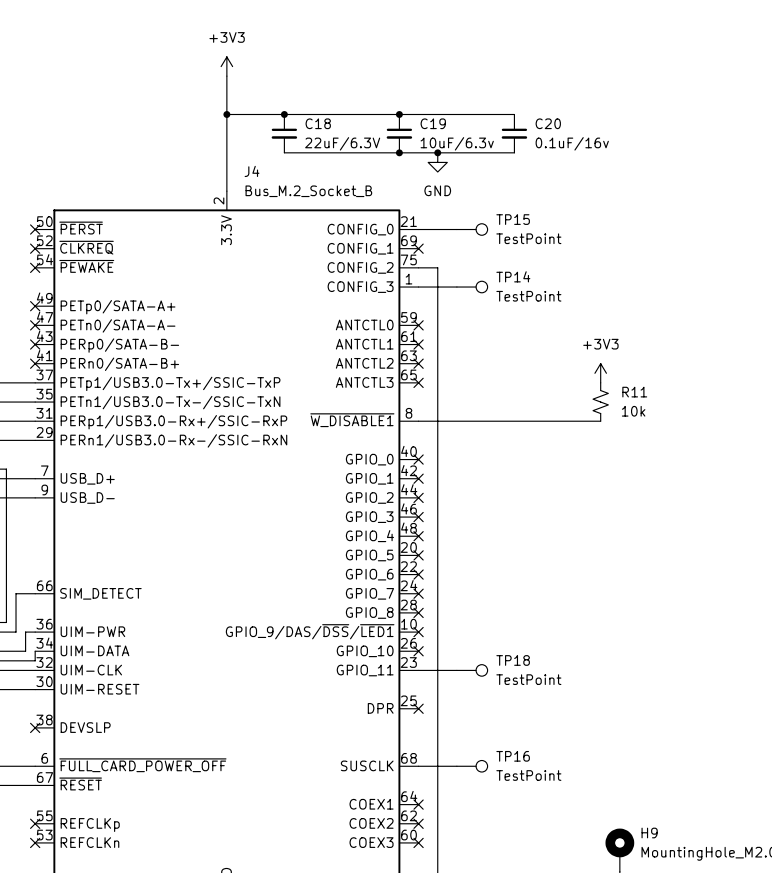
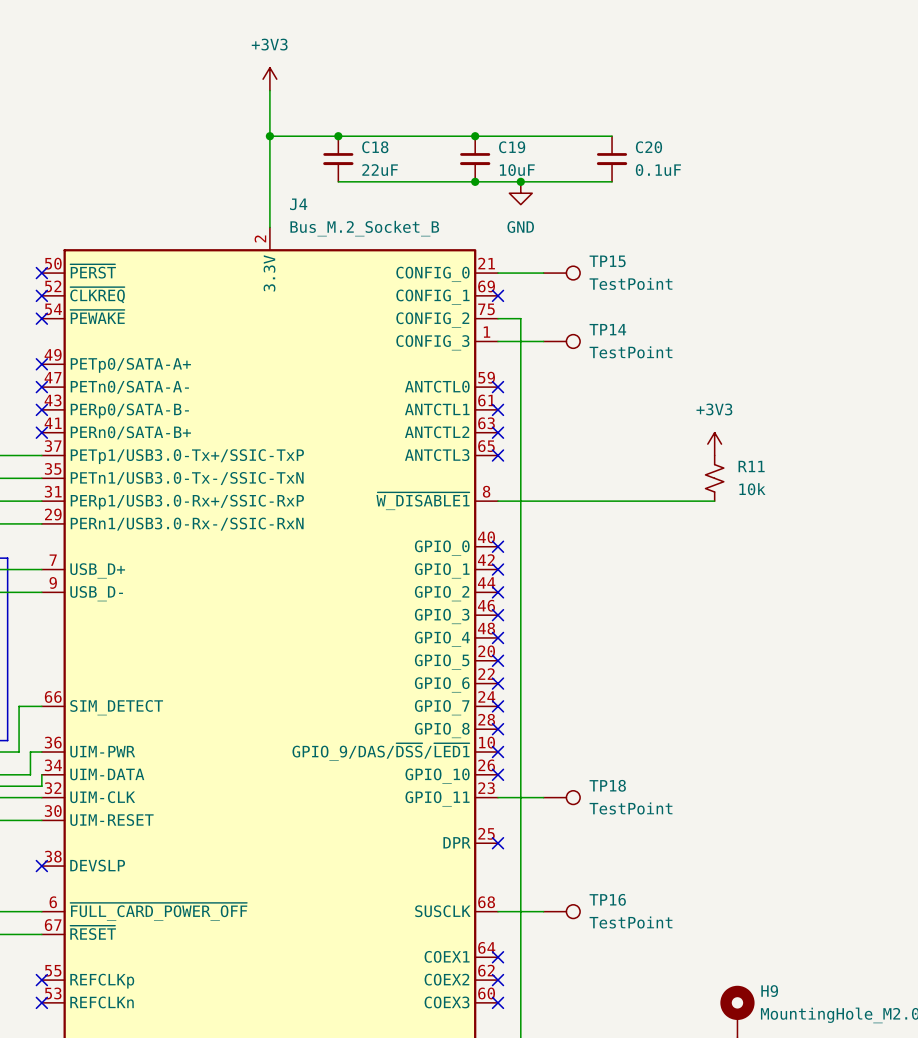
C18 value: 22uF/6.3V (342, 143) -> 22uF (380, 170)
C19 value: 10uF/6.3v (457, 143) -> 10uF (517, 170)
C20 value: 0.1uF/16v (572, 143) -> 0.1uF (658, 170)

